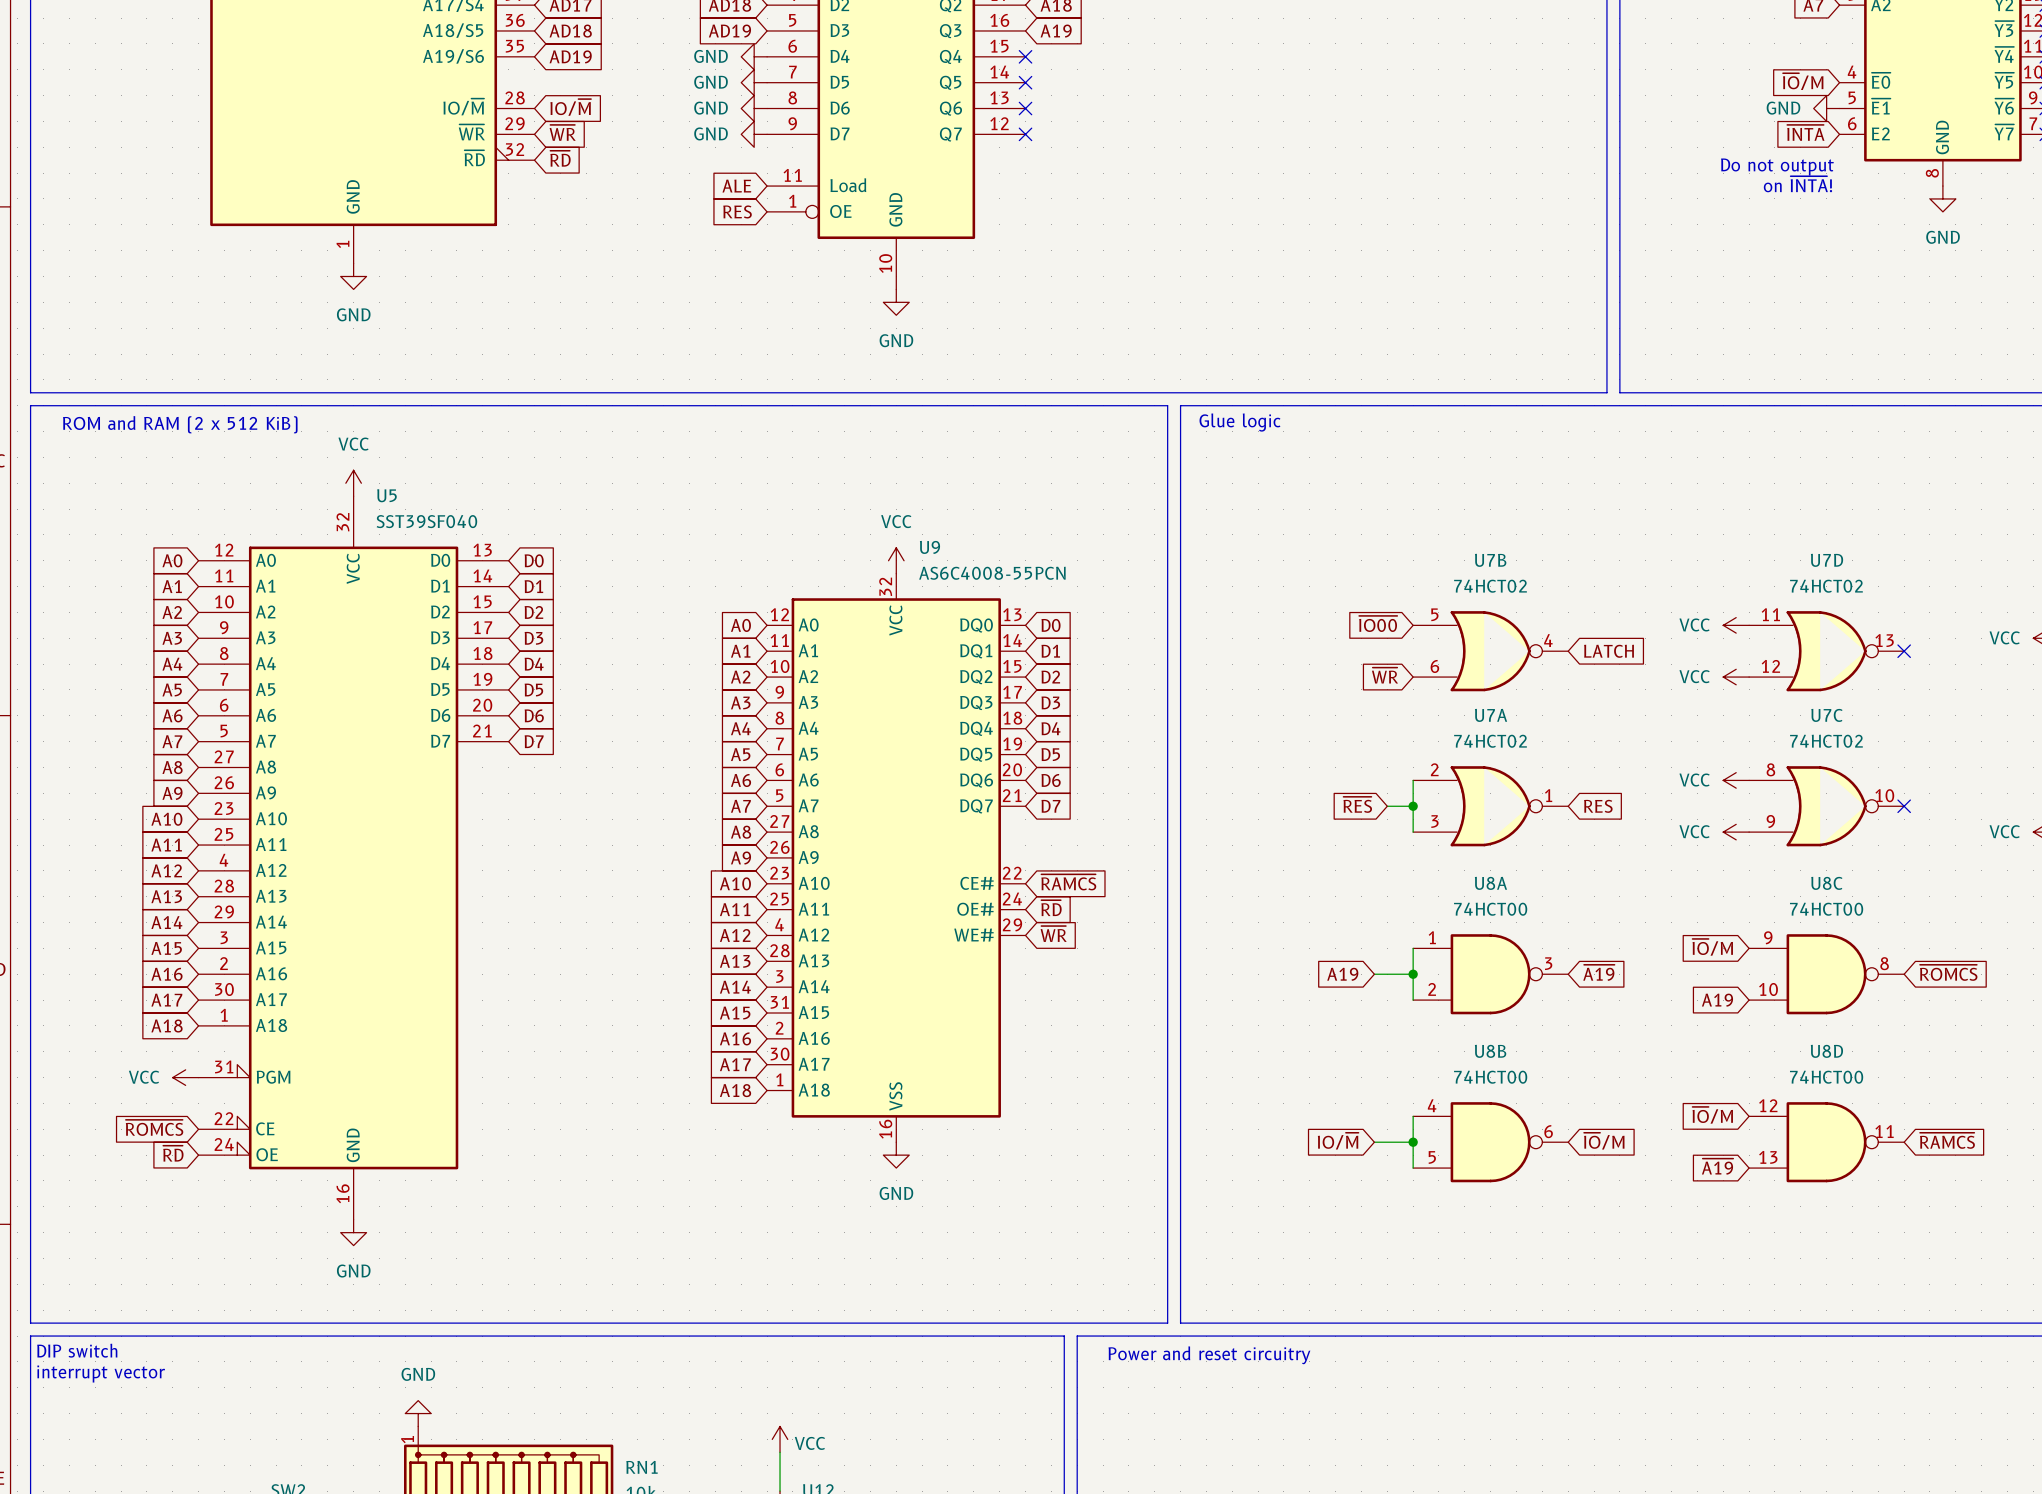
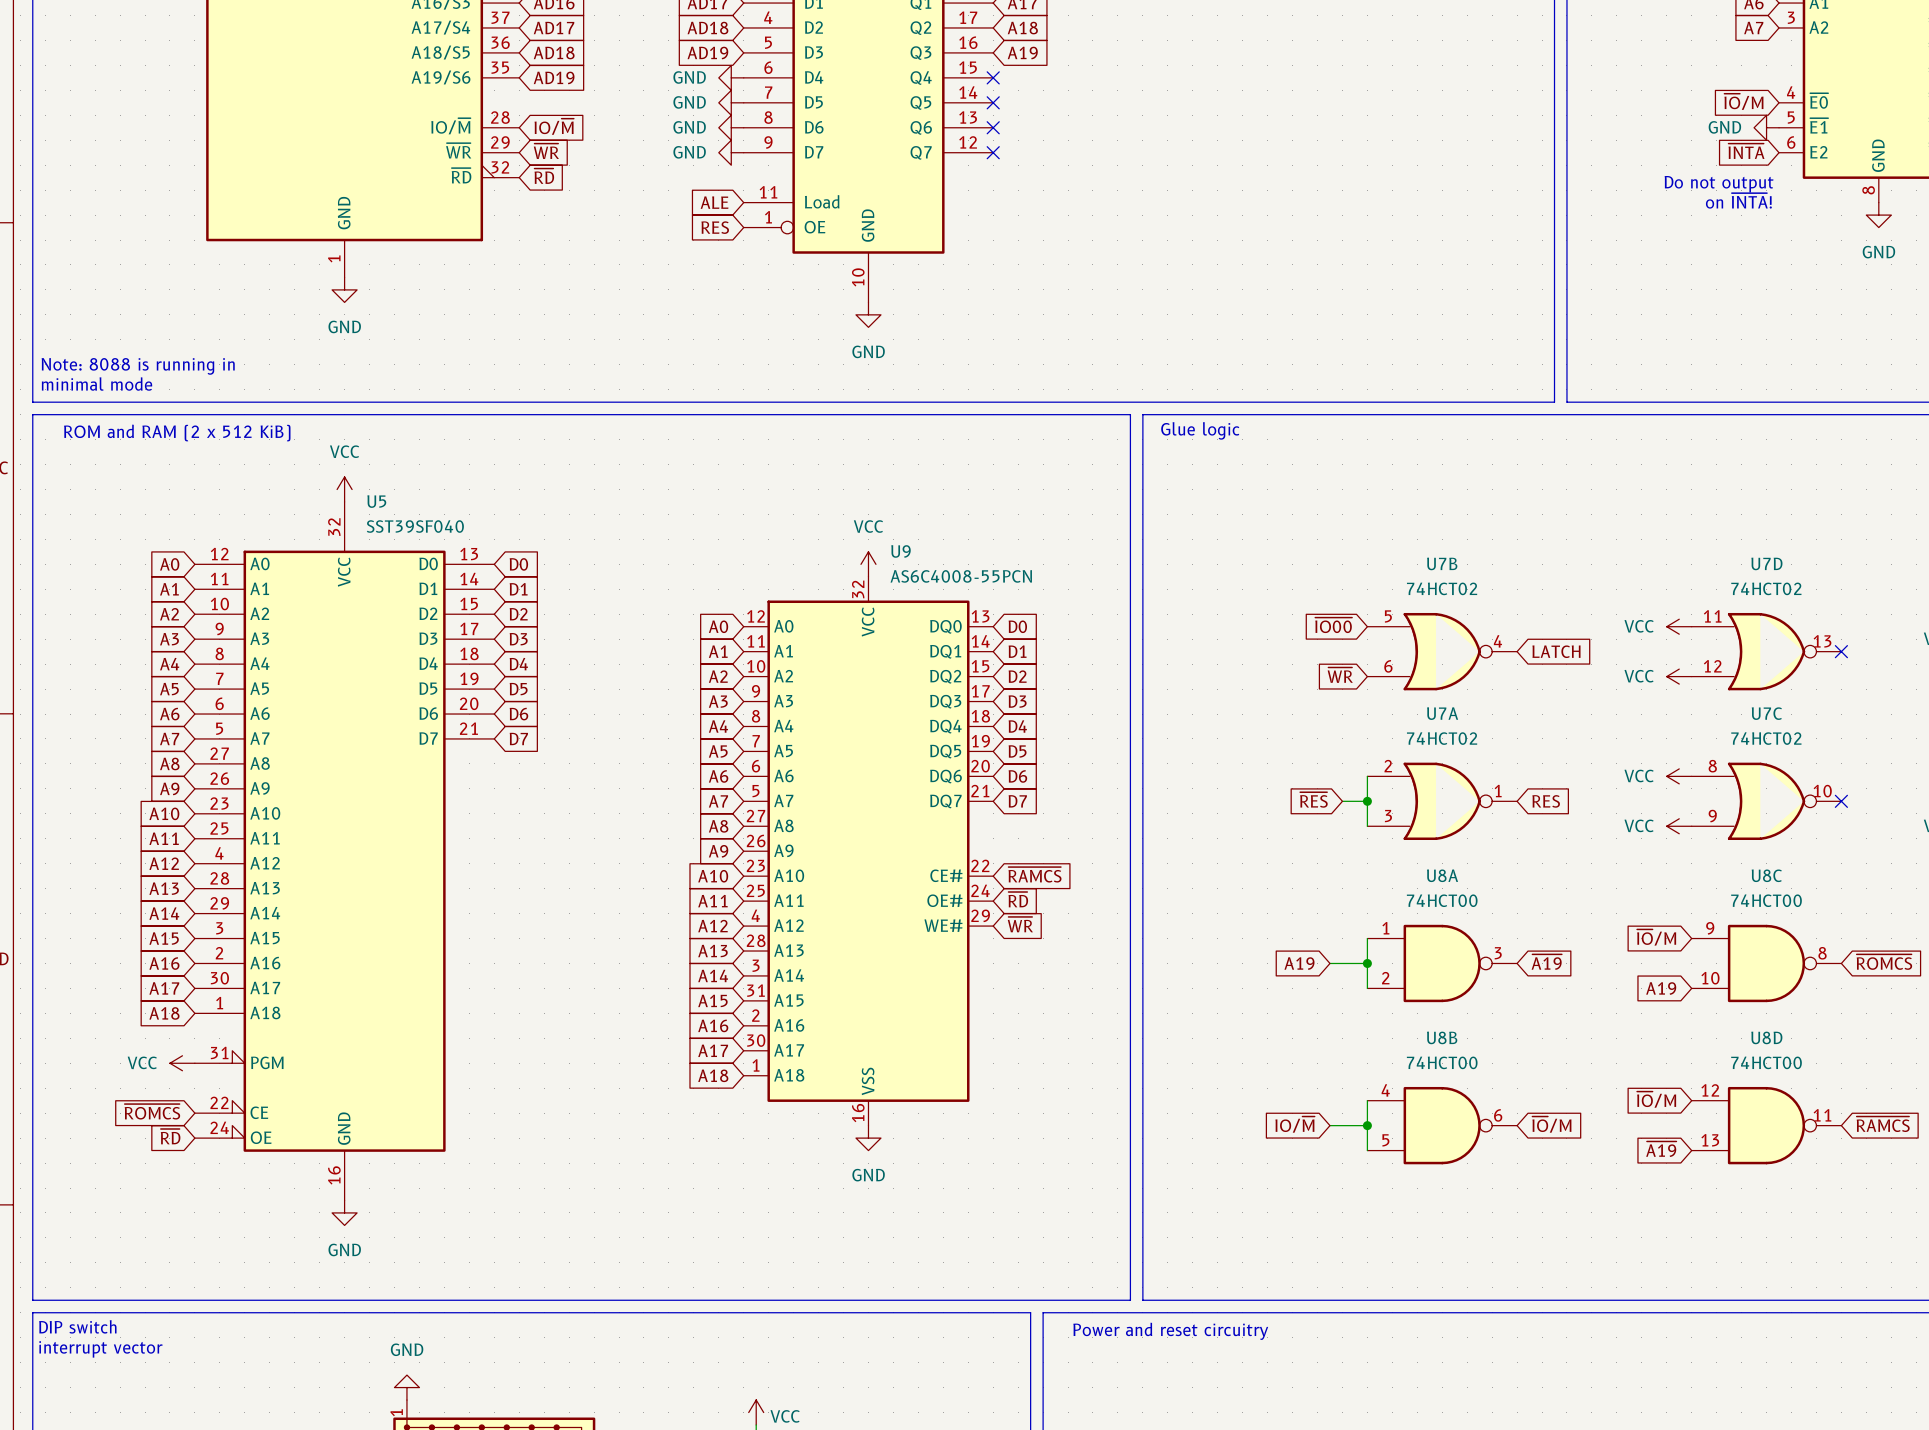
text: none -> Note: 8088 is running in (138, 366)
text: none -> minimal mode (97, 384)

